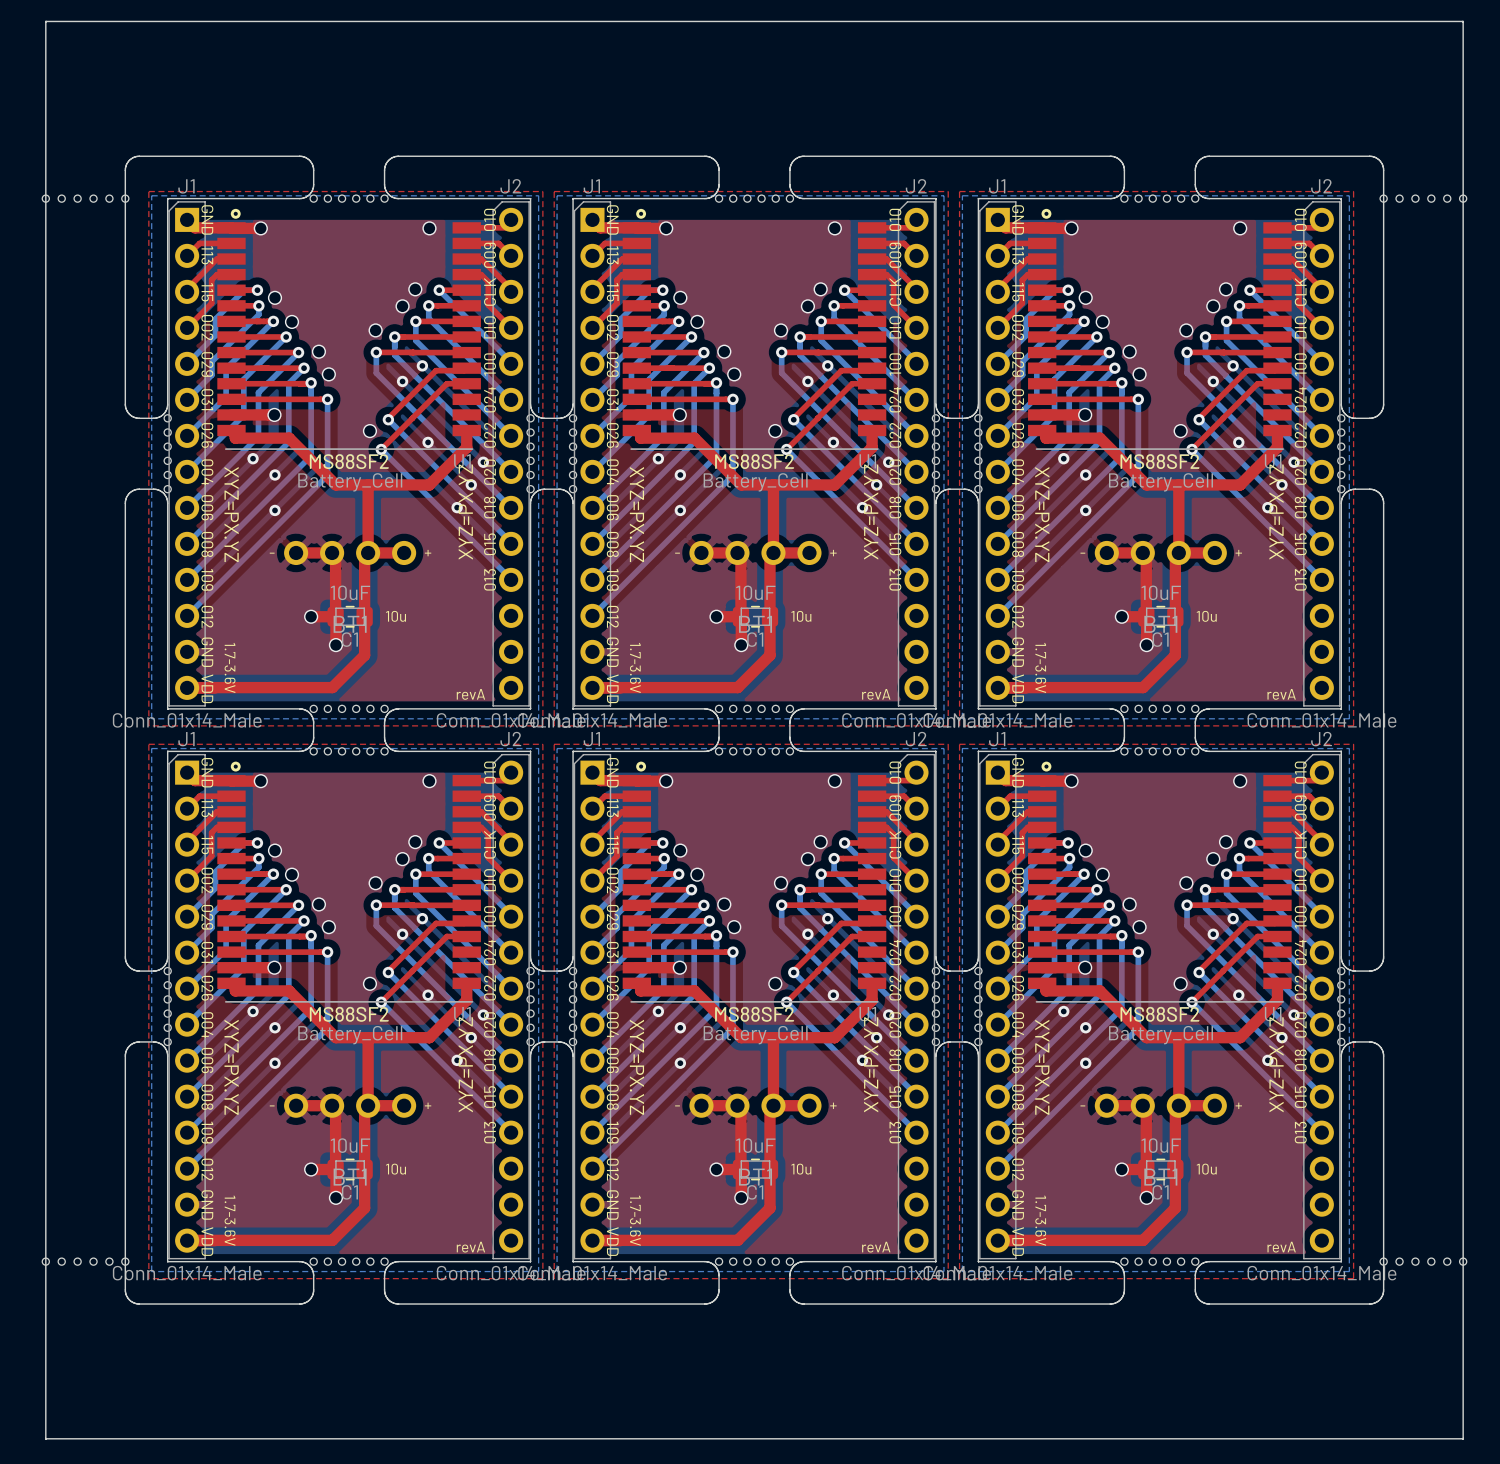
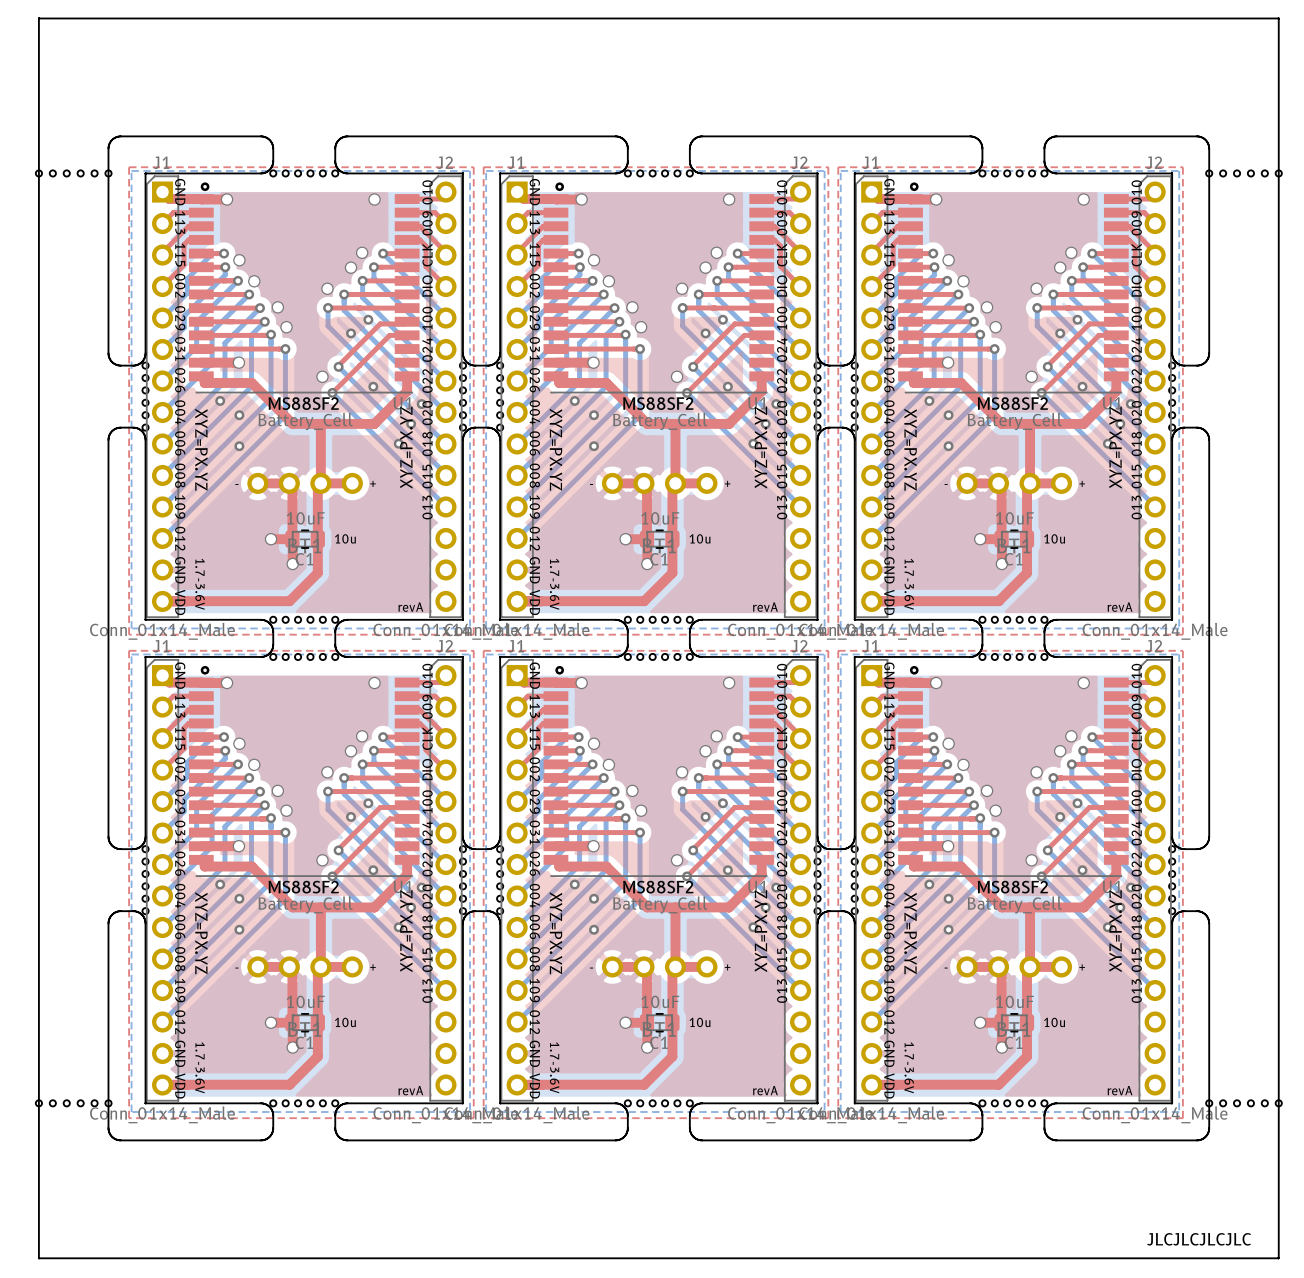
text: none -> JLCJLCJLCJLC (1199, 1239)

